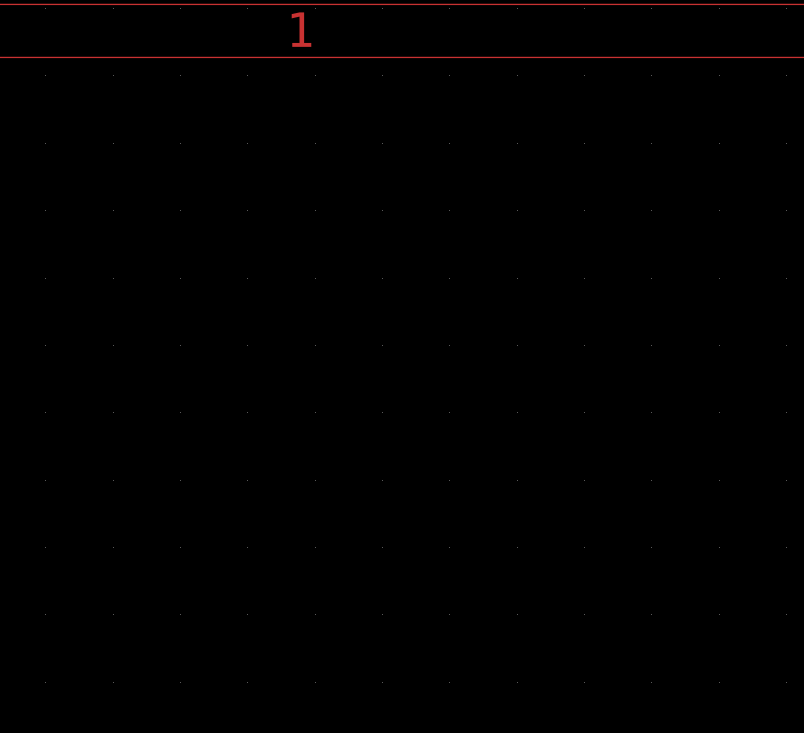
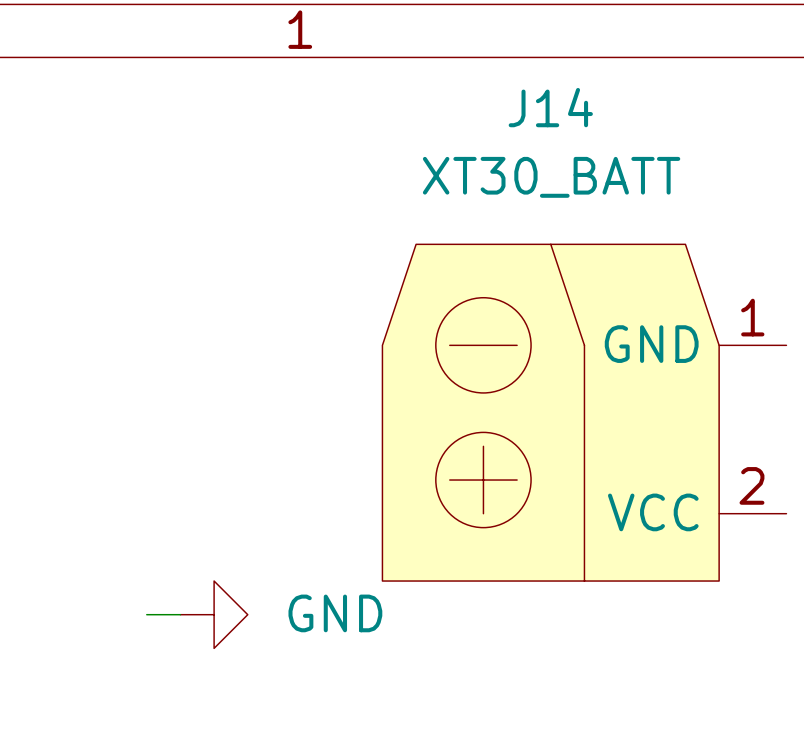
J14: none -> XT30_BATT (584, 412)
wire: none -> (146, 614) (180, 614)
power symbol: none -> GND (214, 614)

